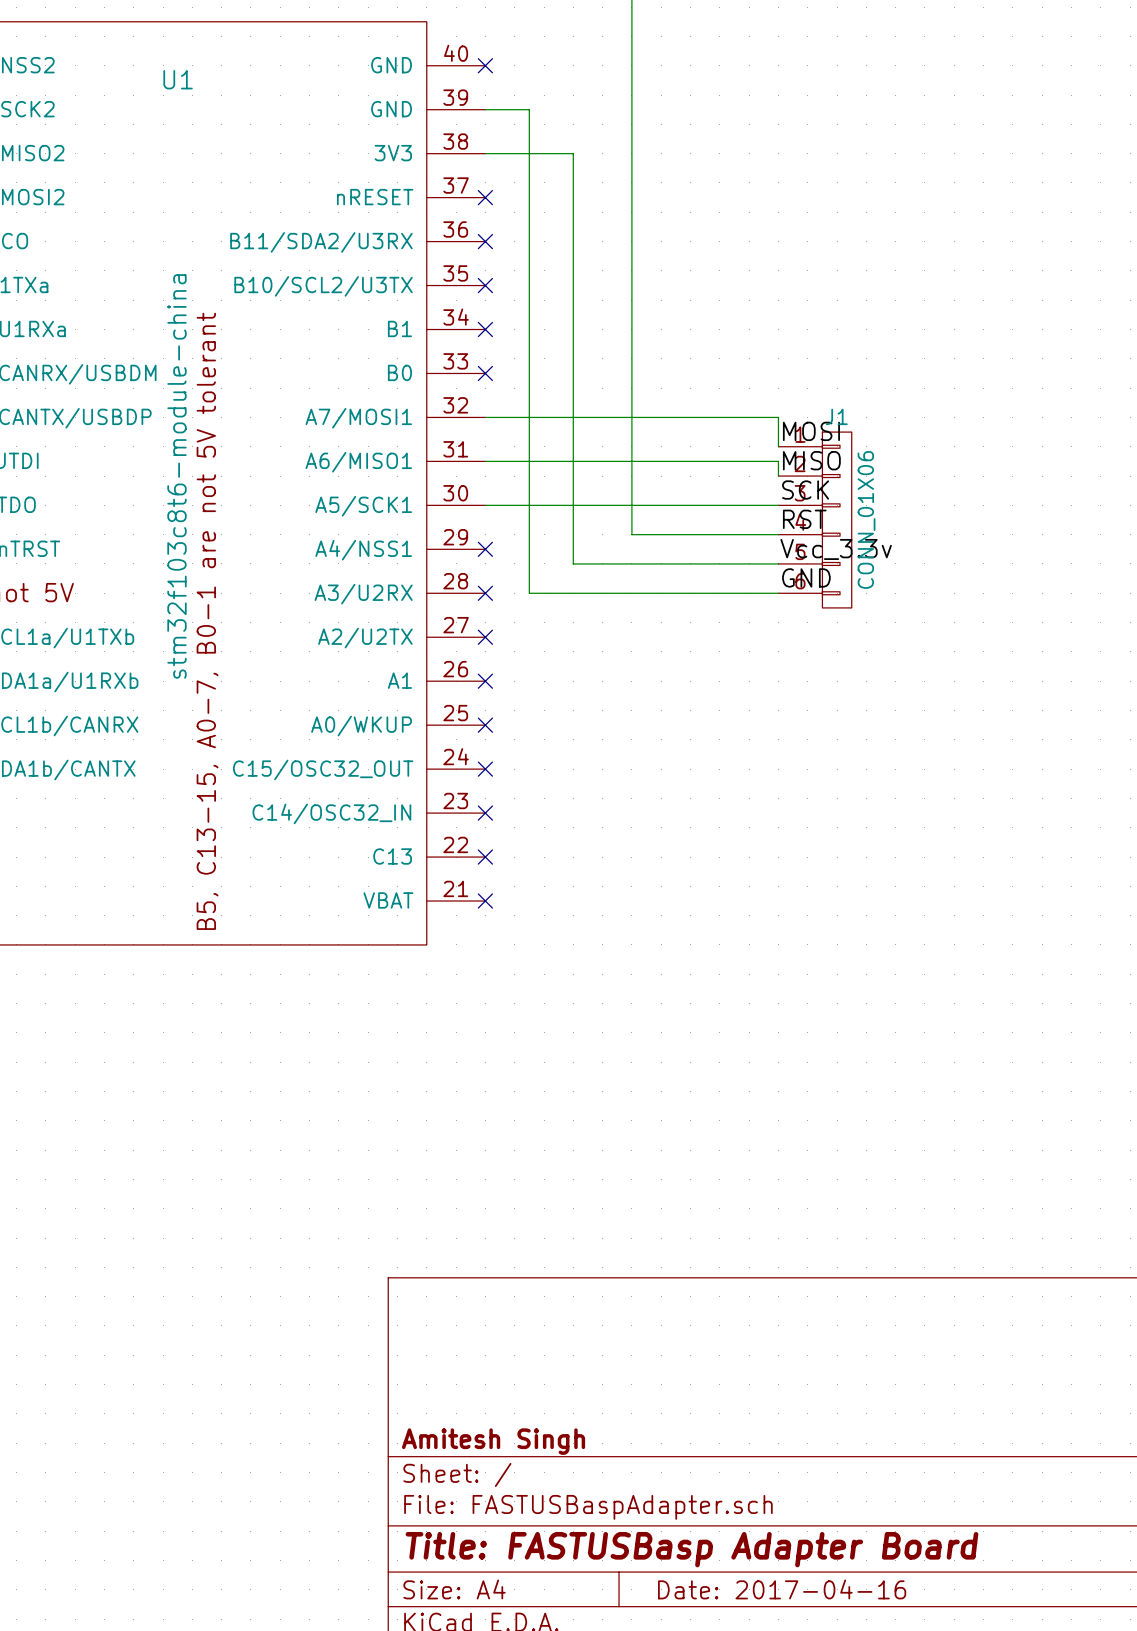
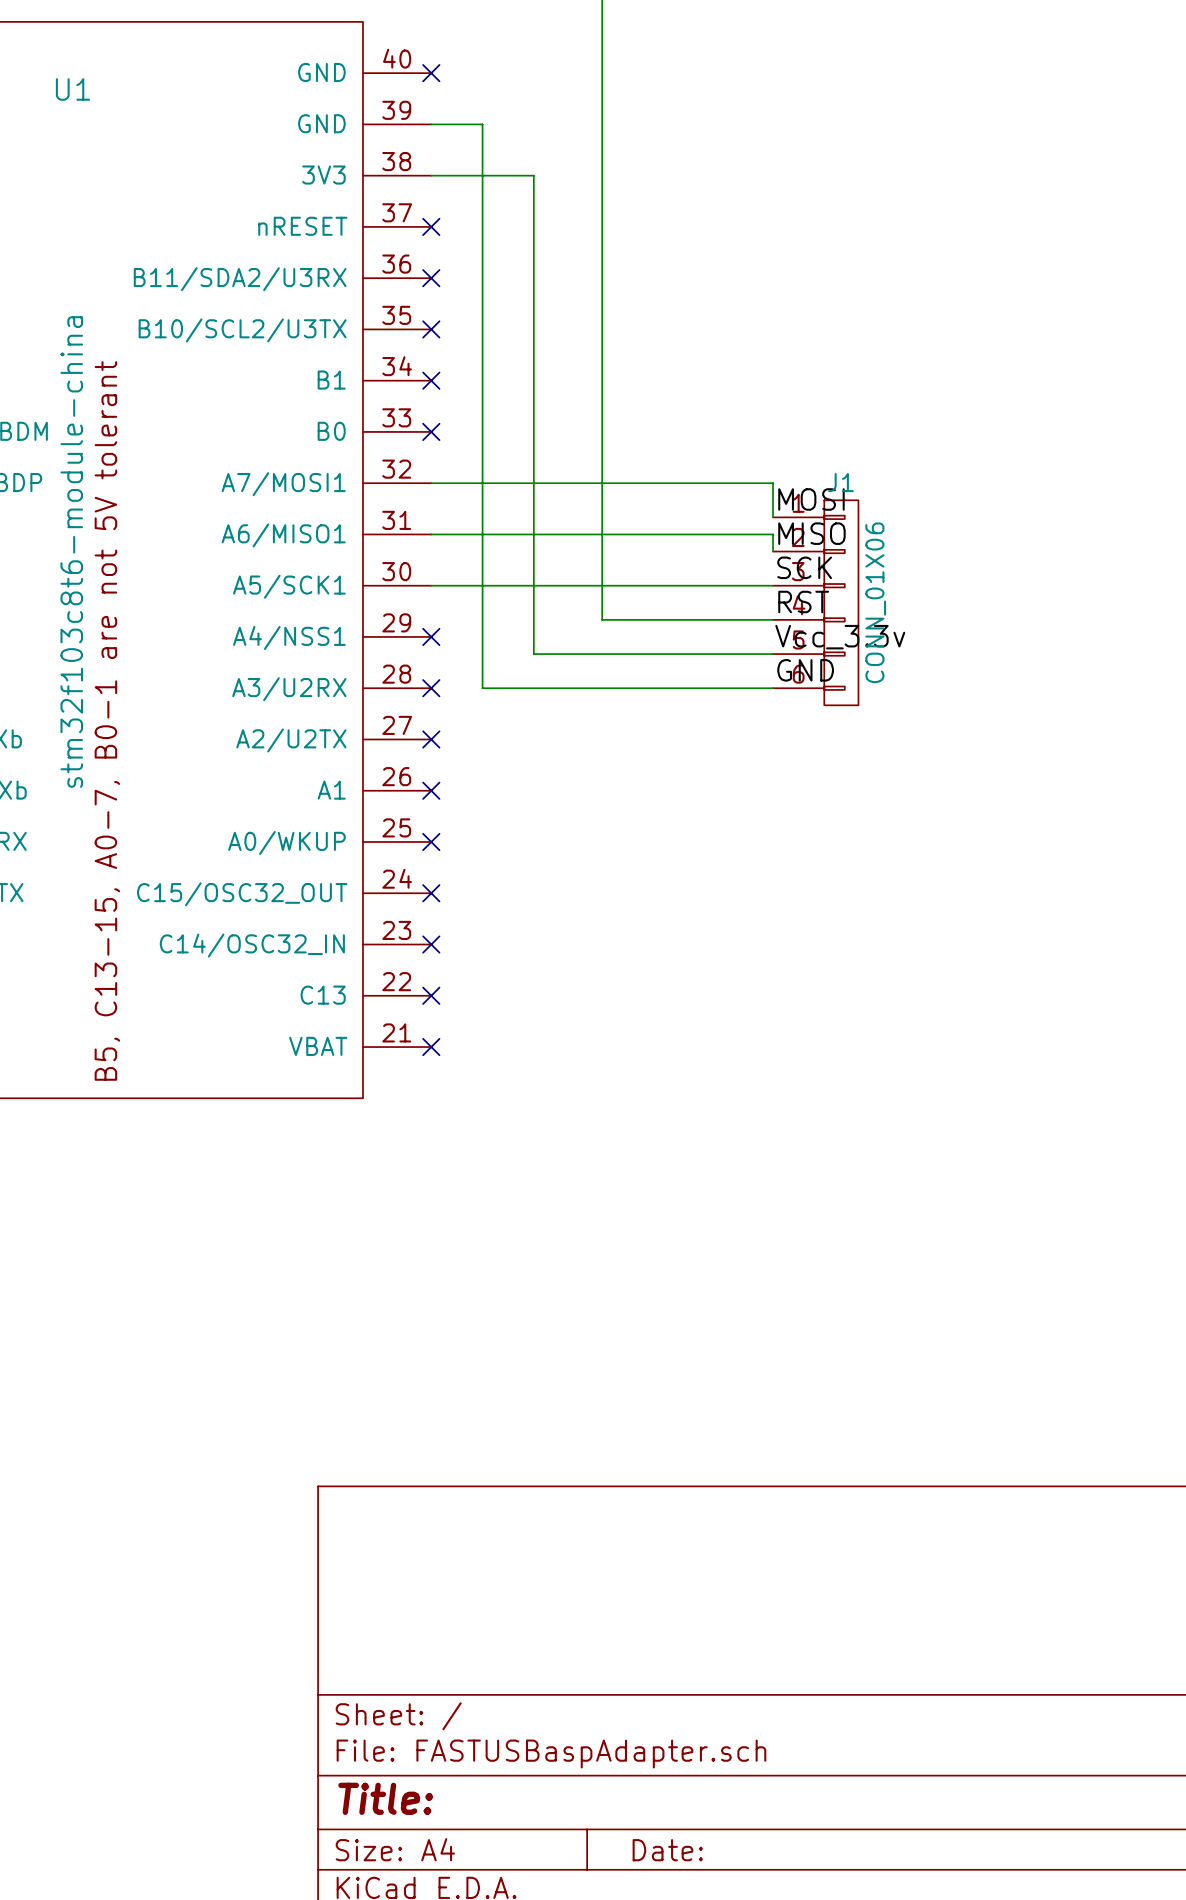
title block: Amitesh Singh (493, 1441) -> none
title block: Title: FASTUSBasp Adapter Board (691, 1549) -> Title: (385, 1798)
title block: Date: 2017-04-16 (782, 1589) -> Date: (667, 1850)

